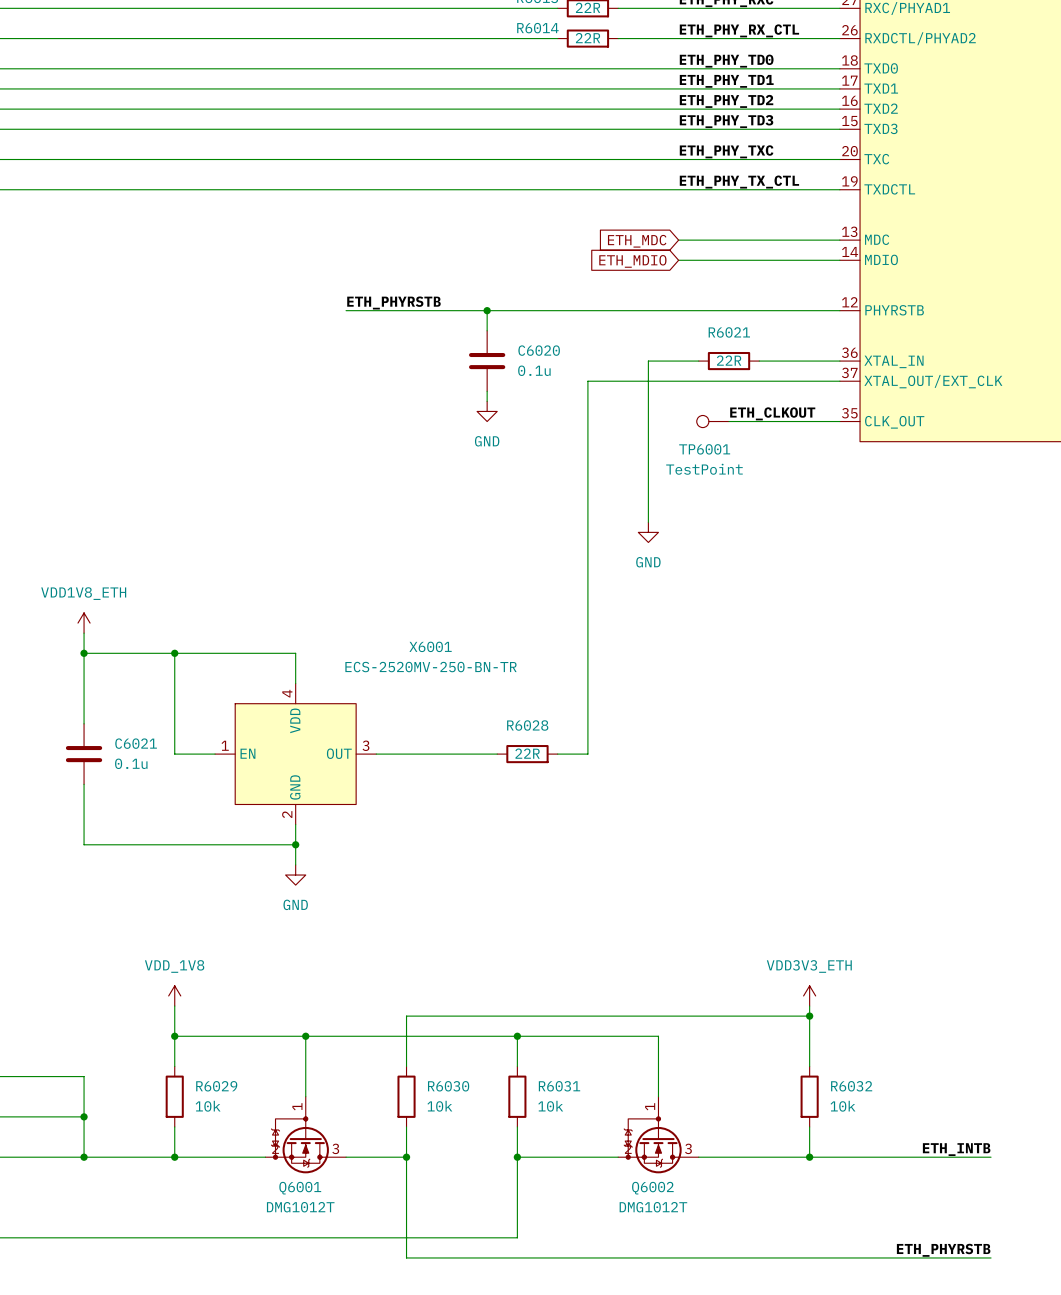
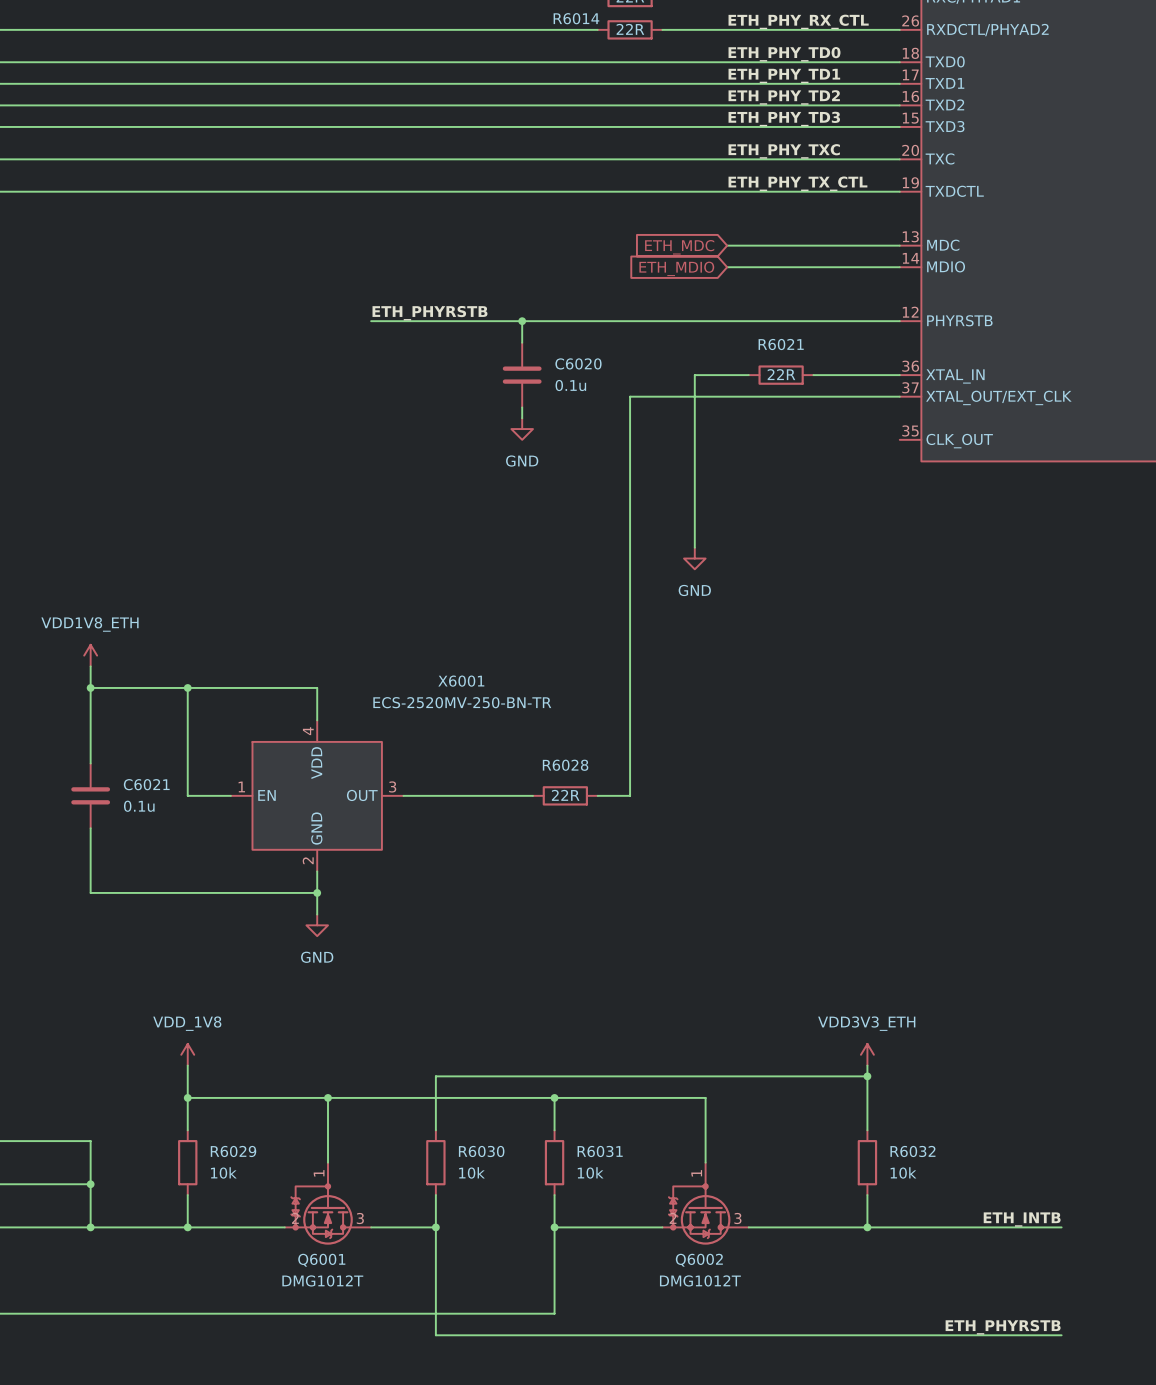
label: ETH_CLKOUT (772, 413) -> none
TP6001: TestPoint (712, 421) -> none
wire: (729, 421) (839, 421) -> none

